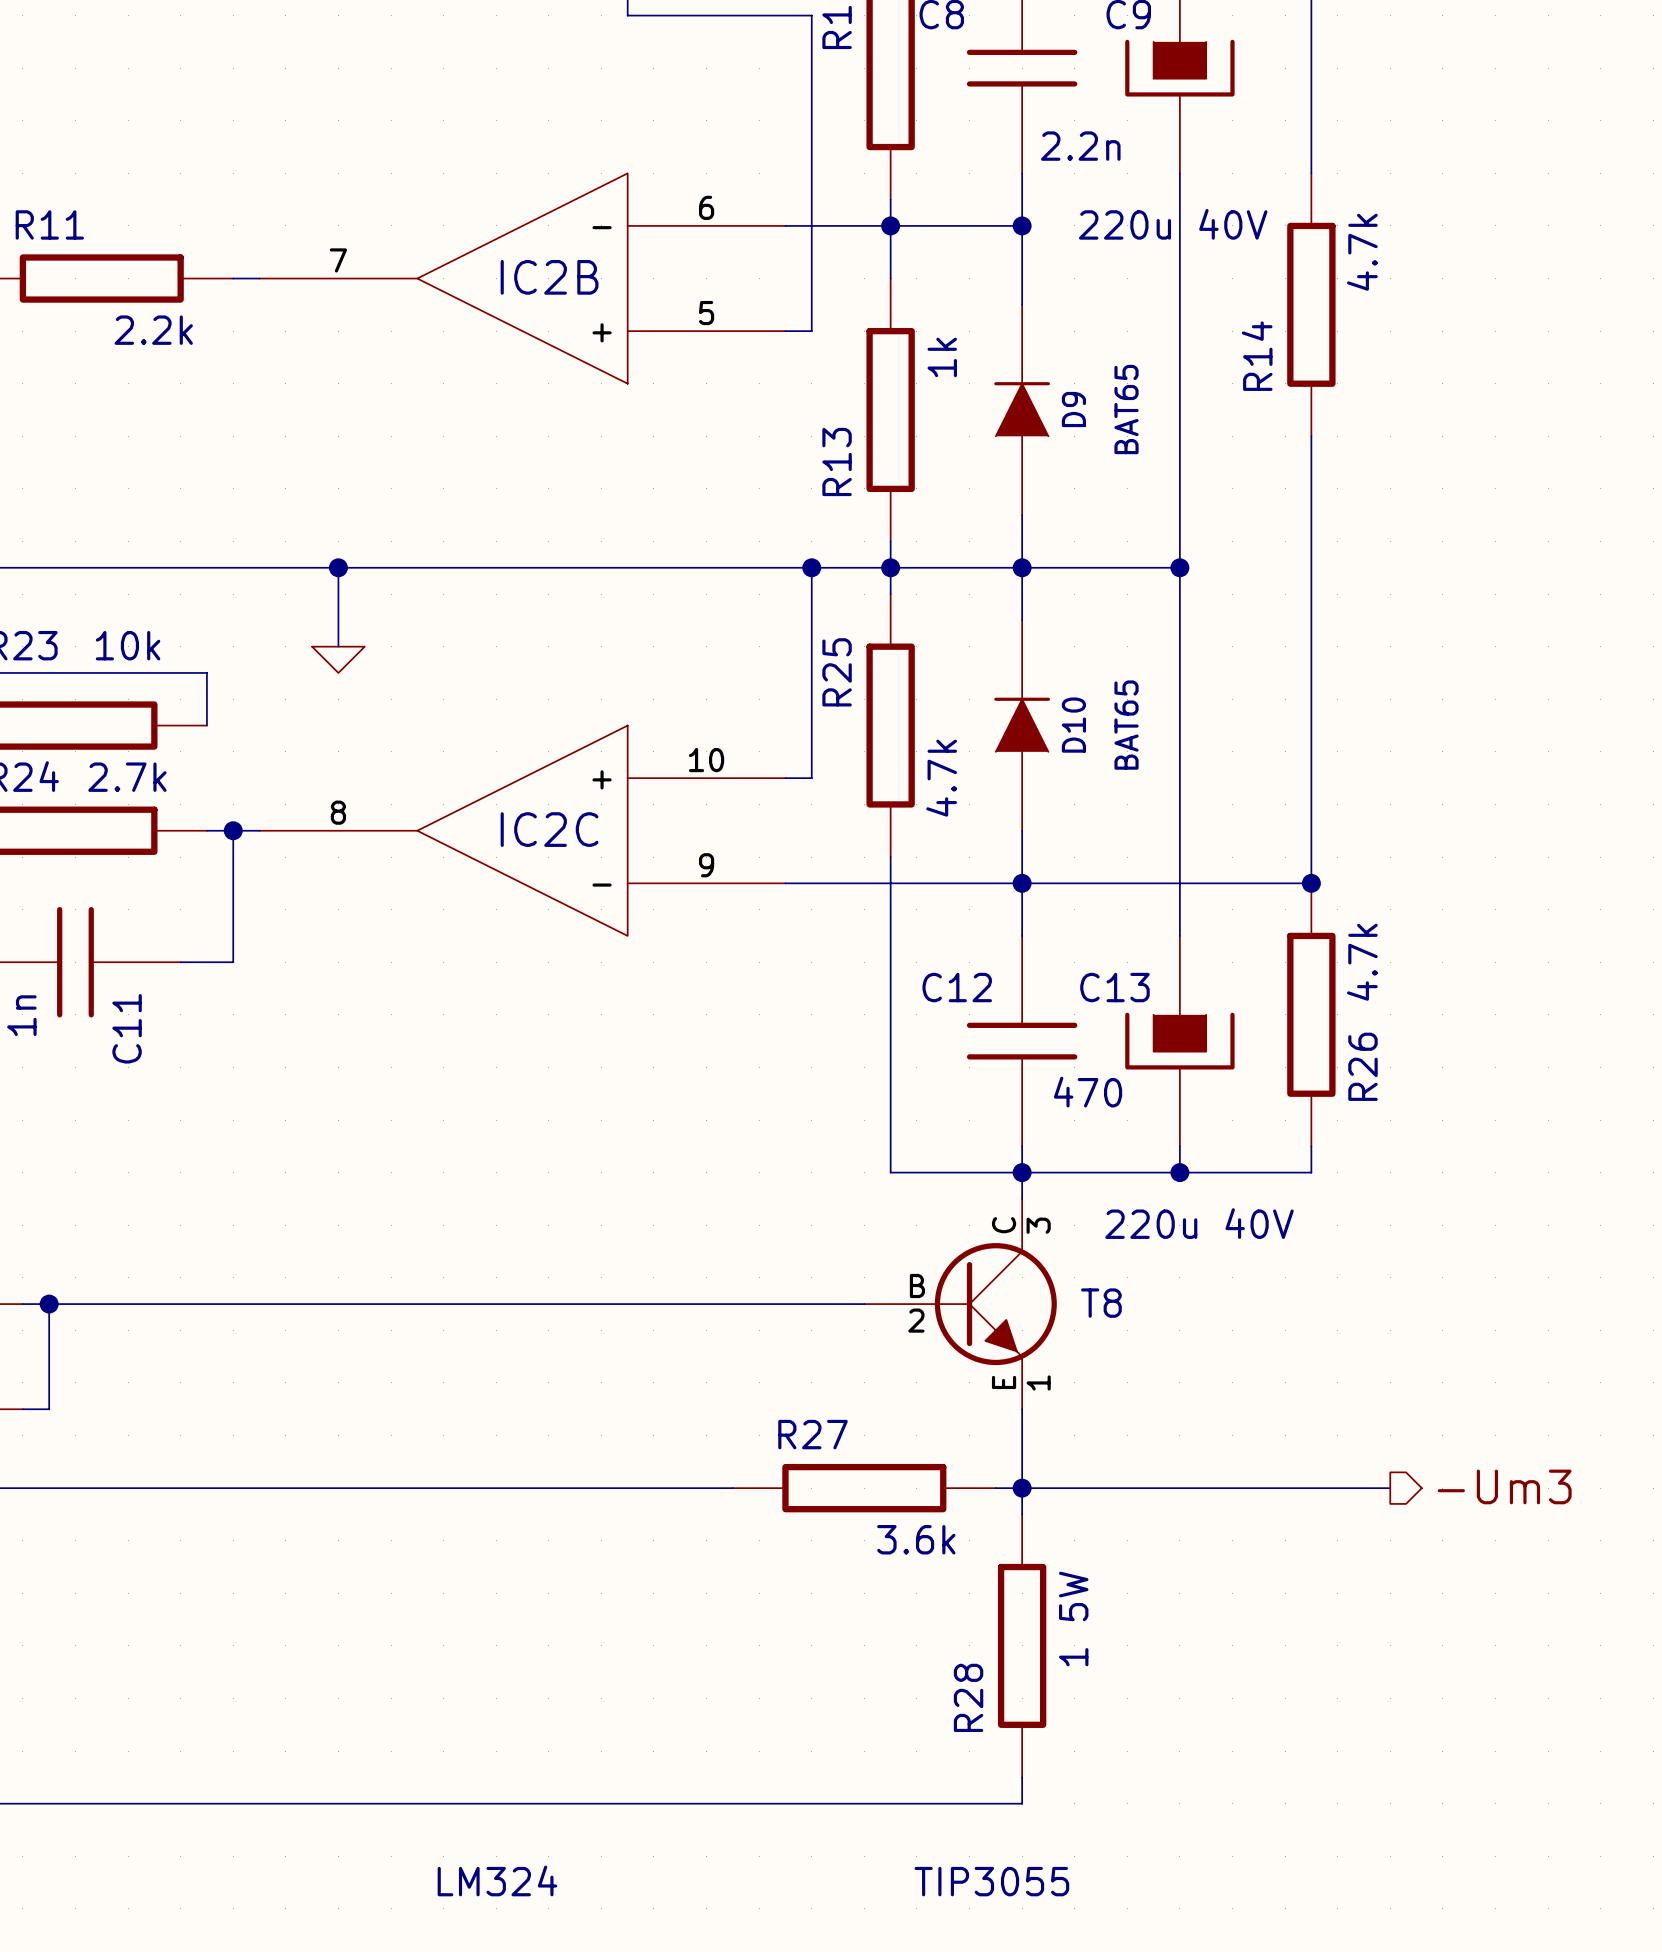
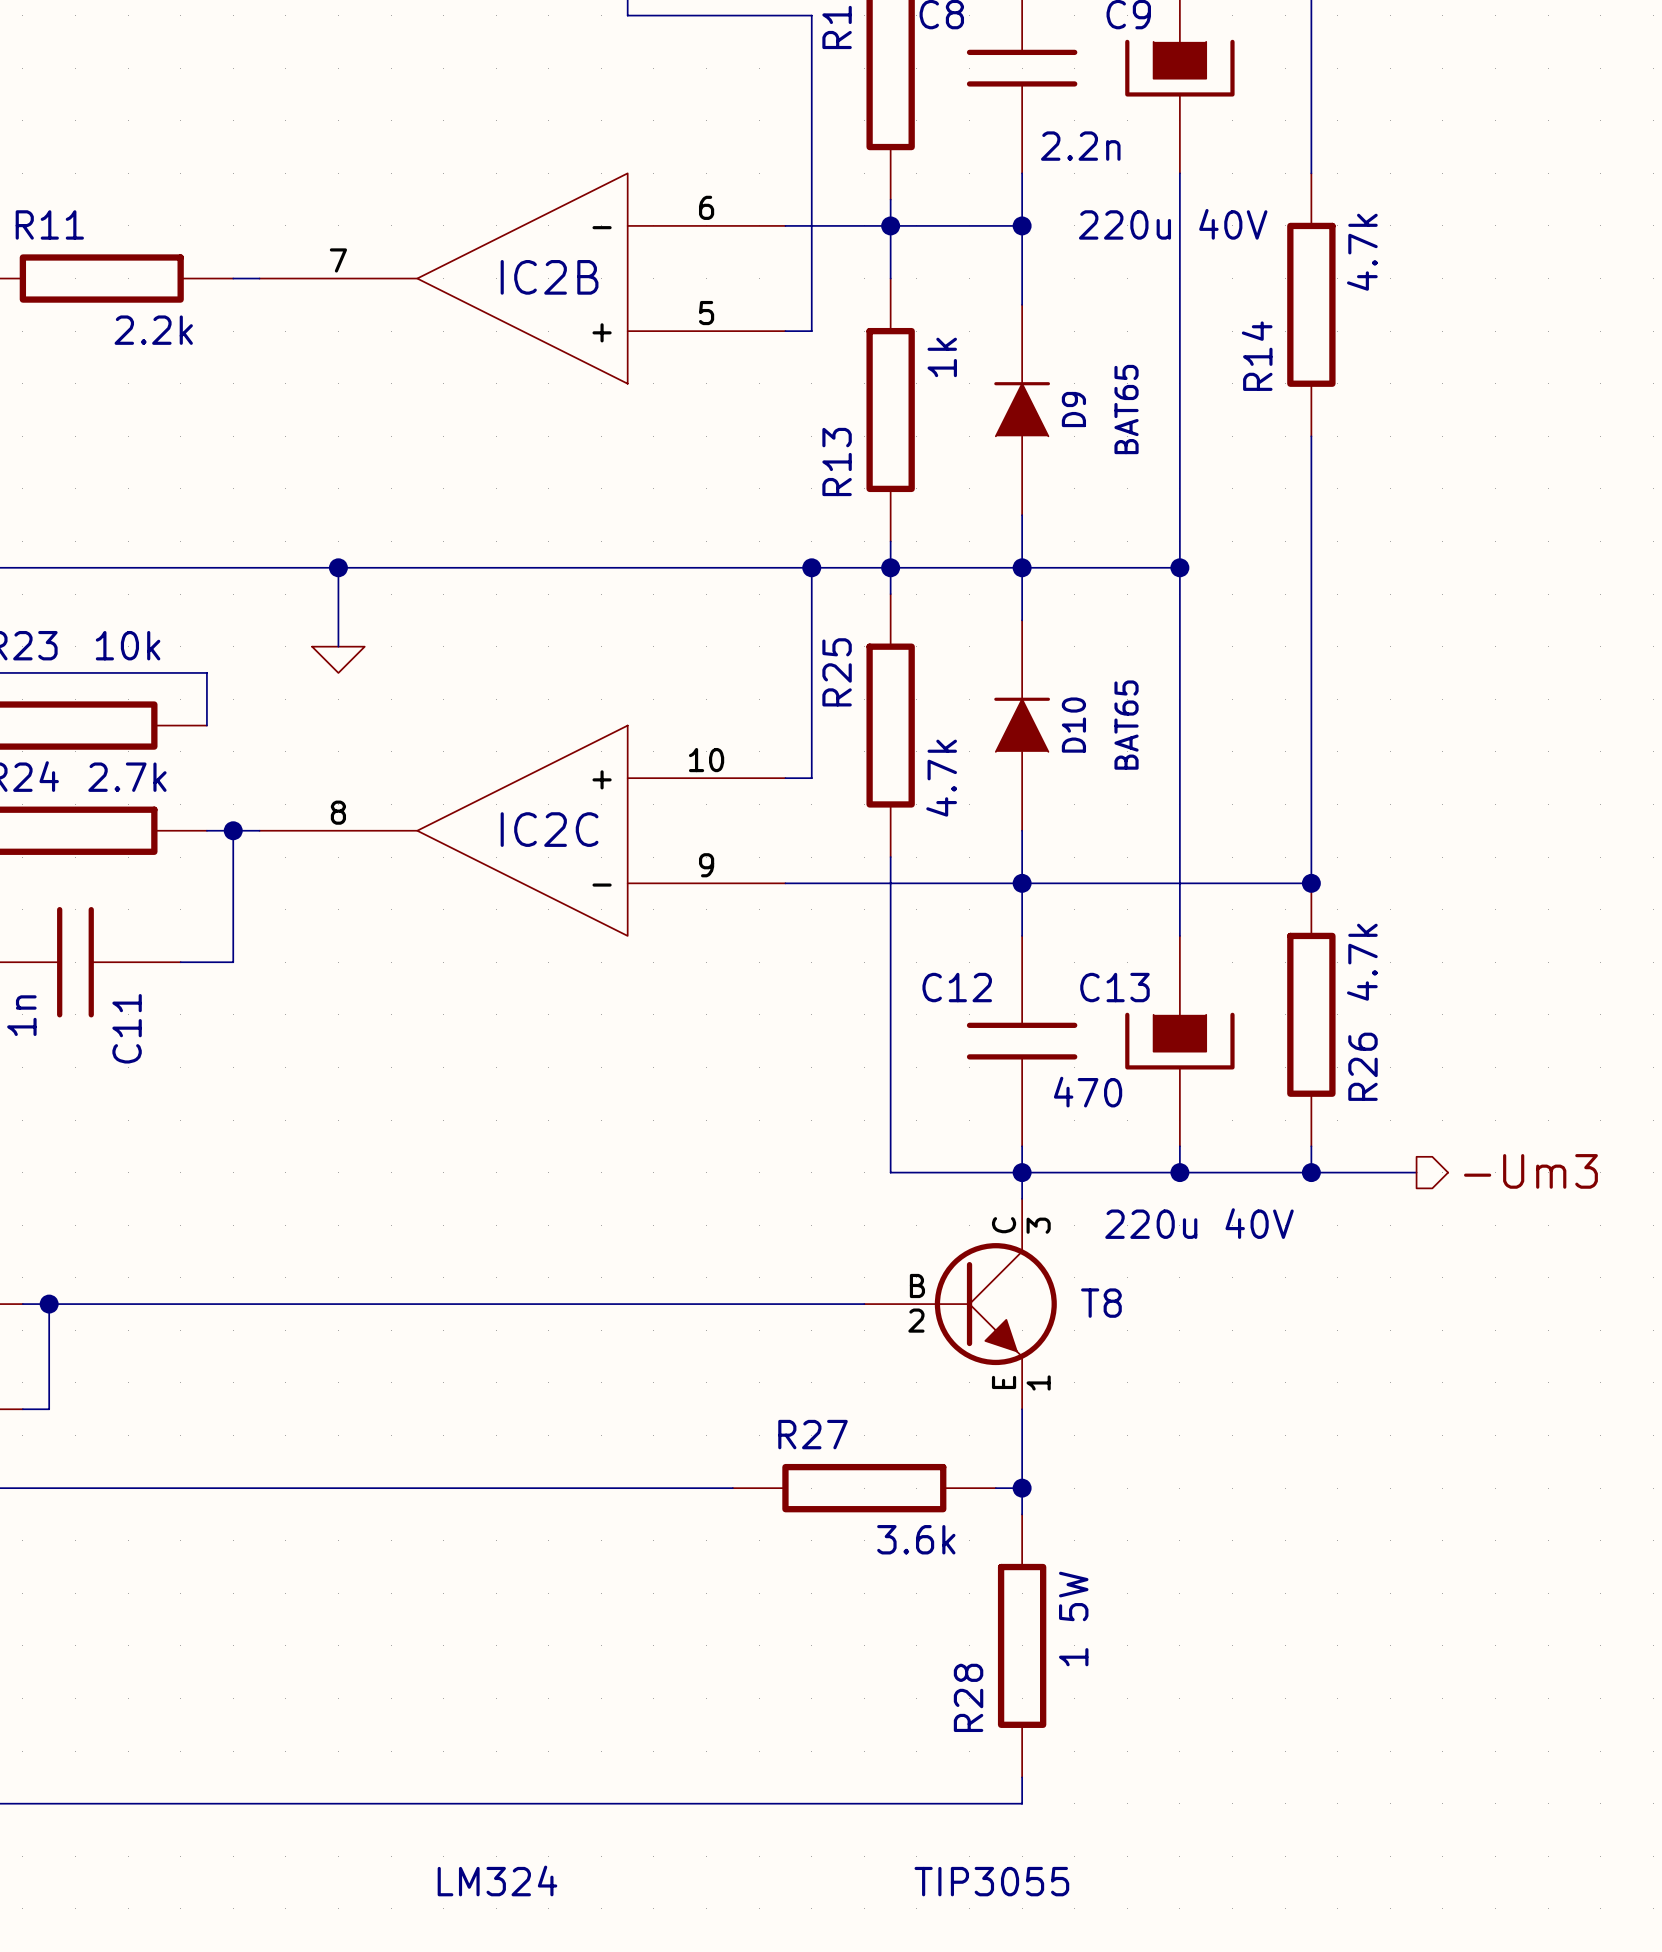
wire: none -> (1311, 1172) (1416, 1172)
junction: none -> (1311, 1172)
hierarchical label position: -Um3 (1504, 1486) -> -Um3 (1530, 1171)
wire: (1022, 1488) (1390, 1488) -> none

